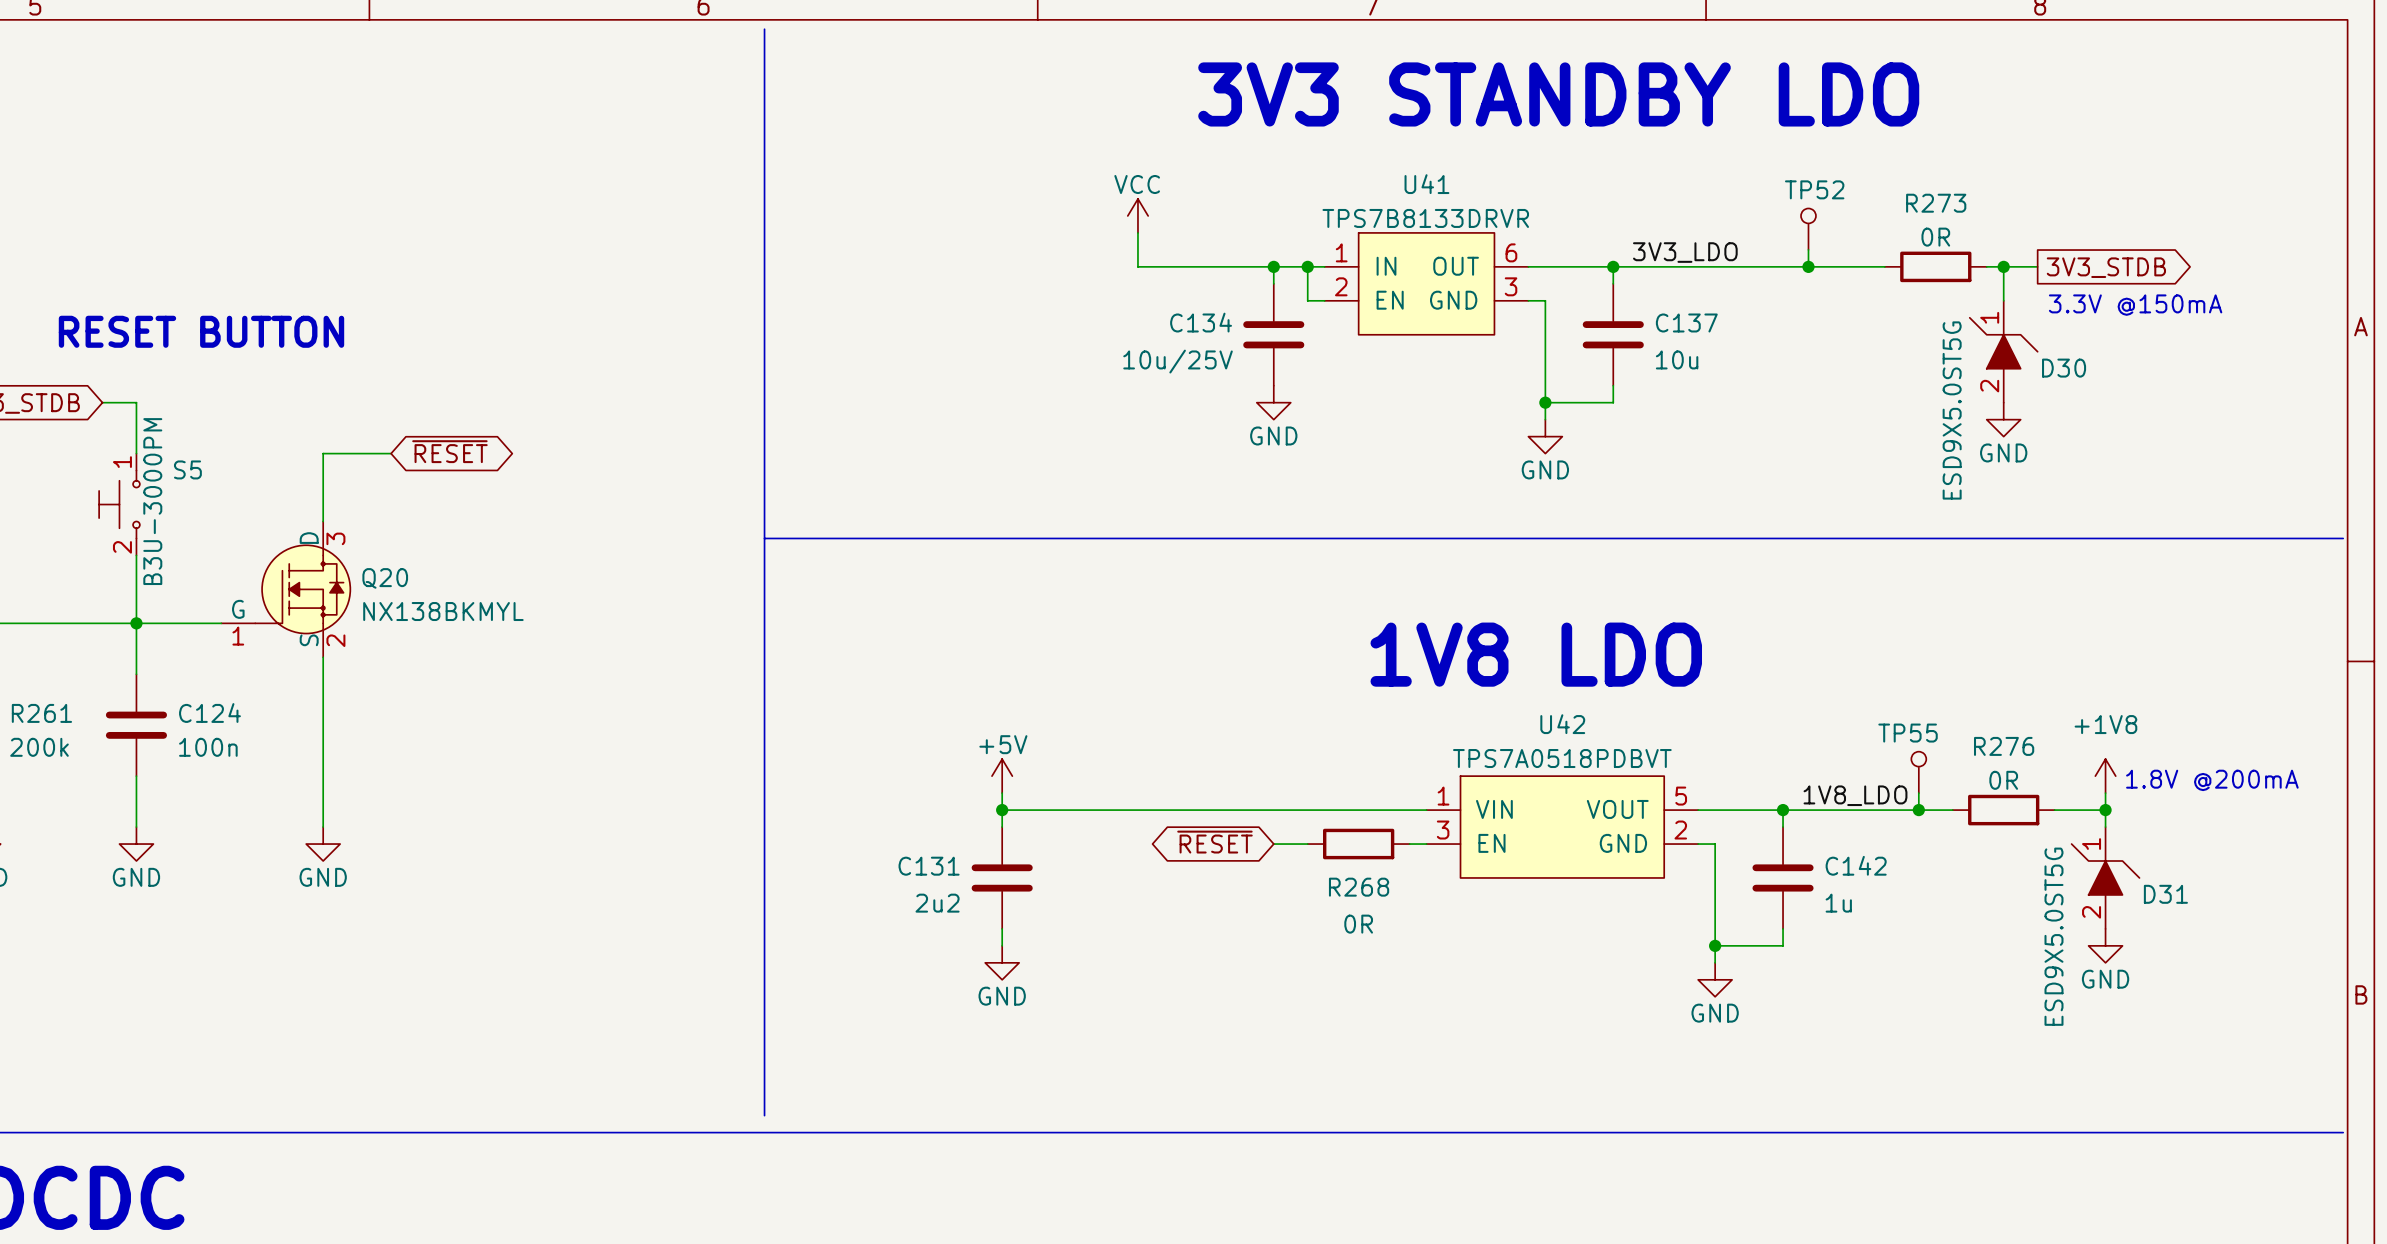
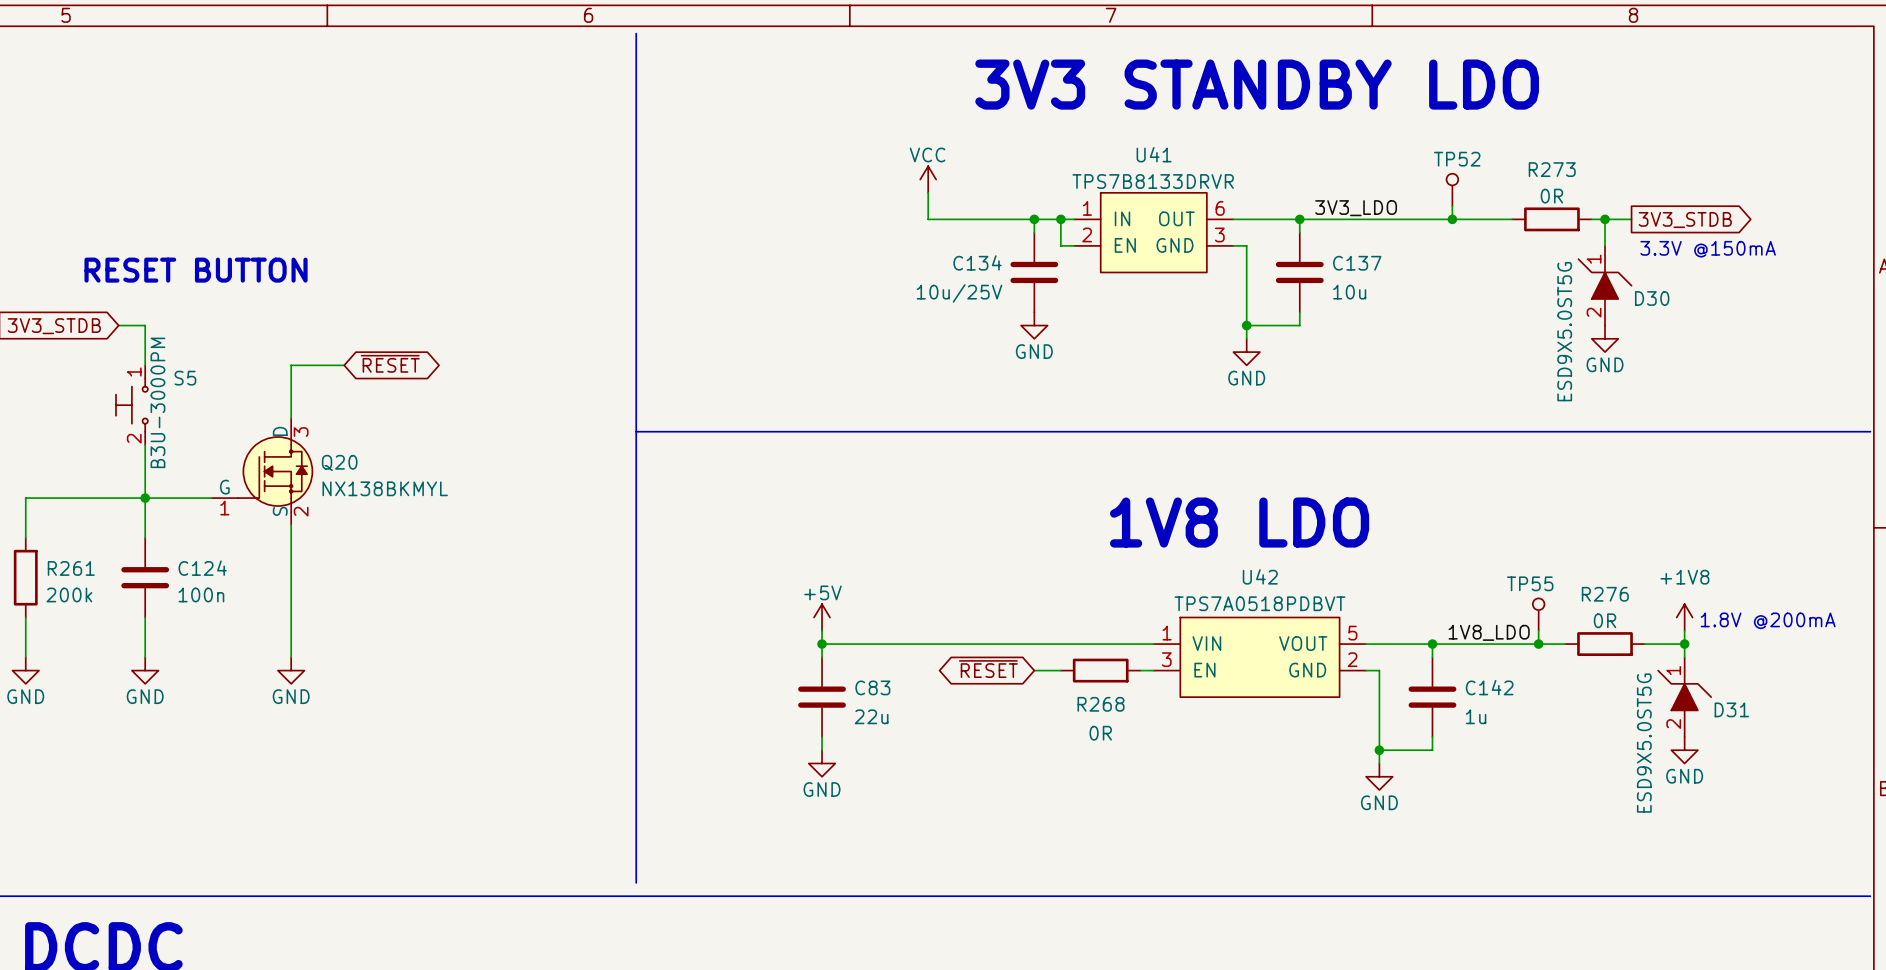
C131 name: C131 (929, 866) -> C83 (872, 687)
C131 text: 2u2 (937, 903) -> 22u (871, 716)

